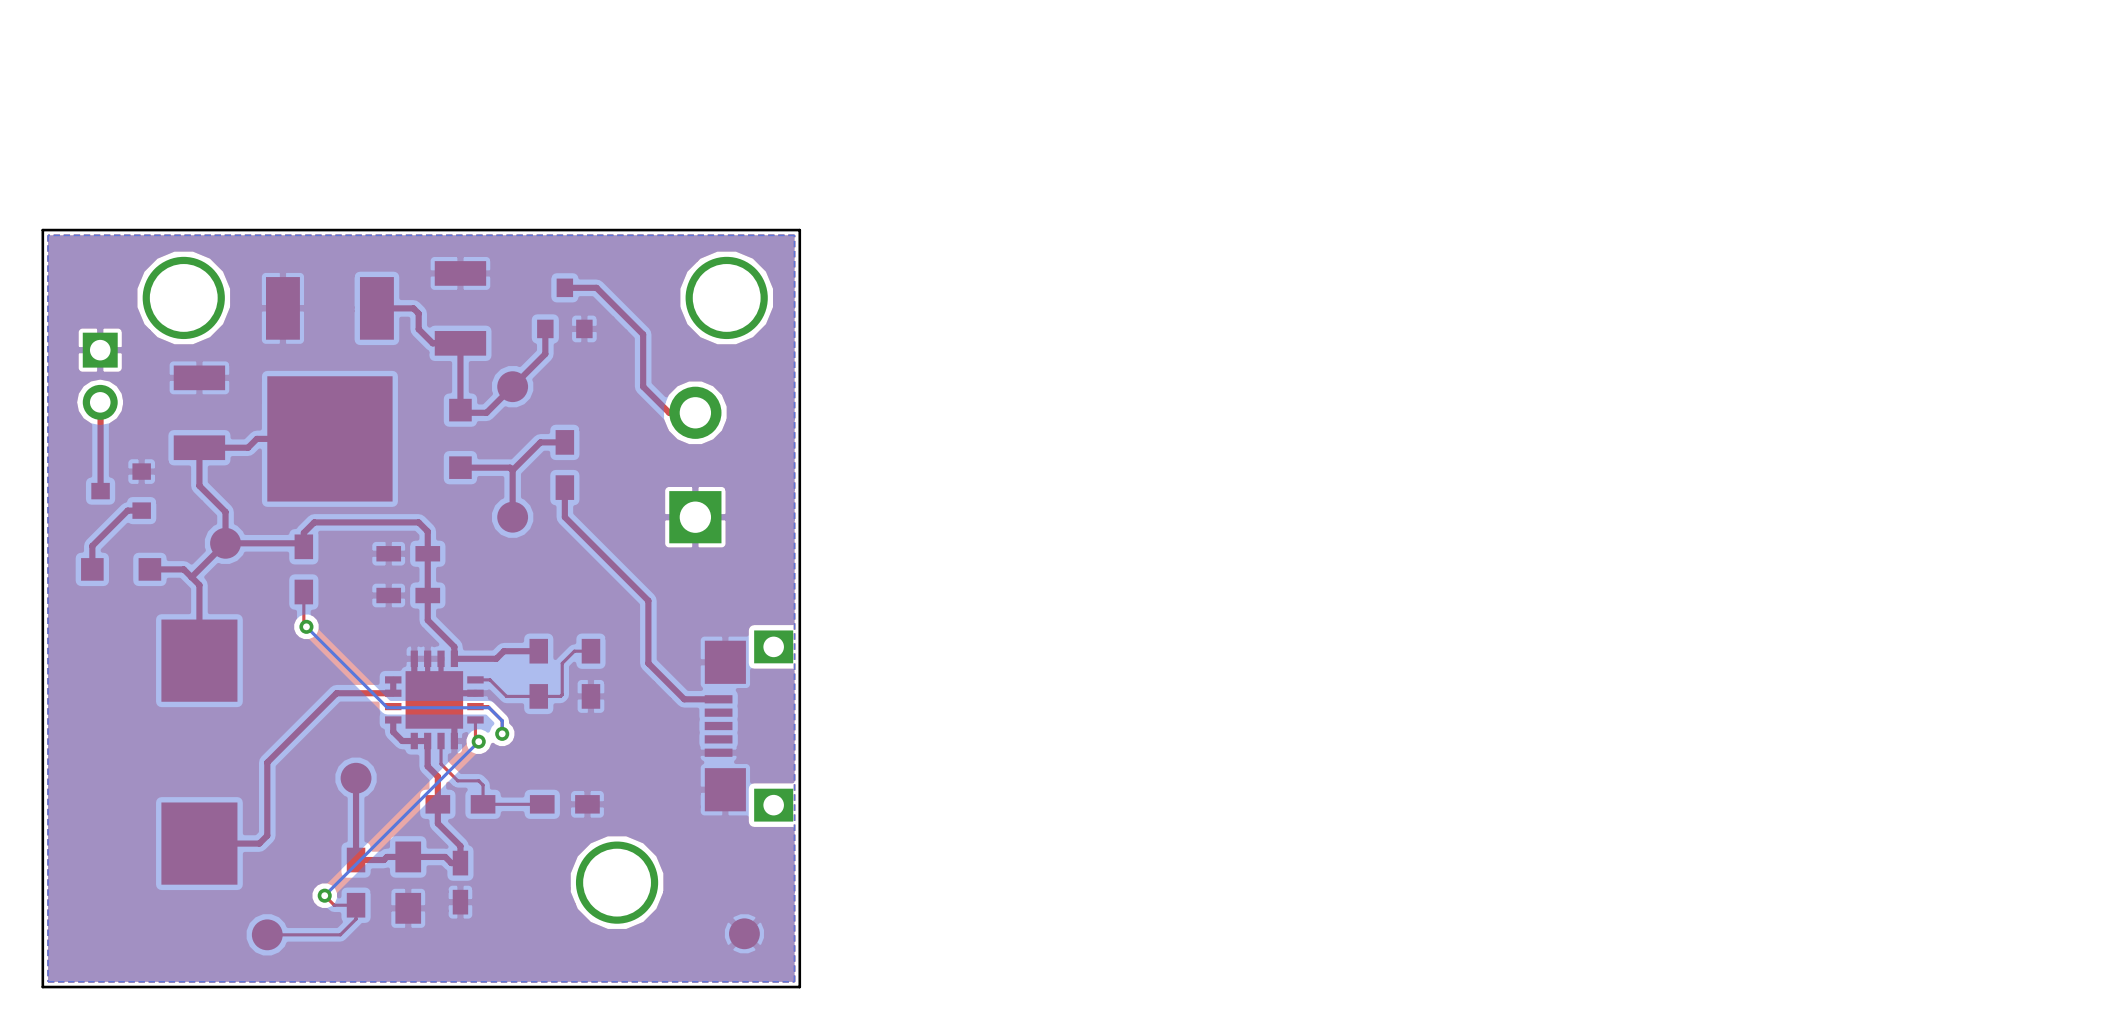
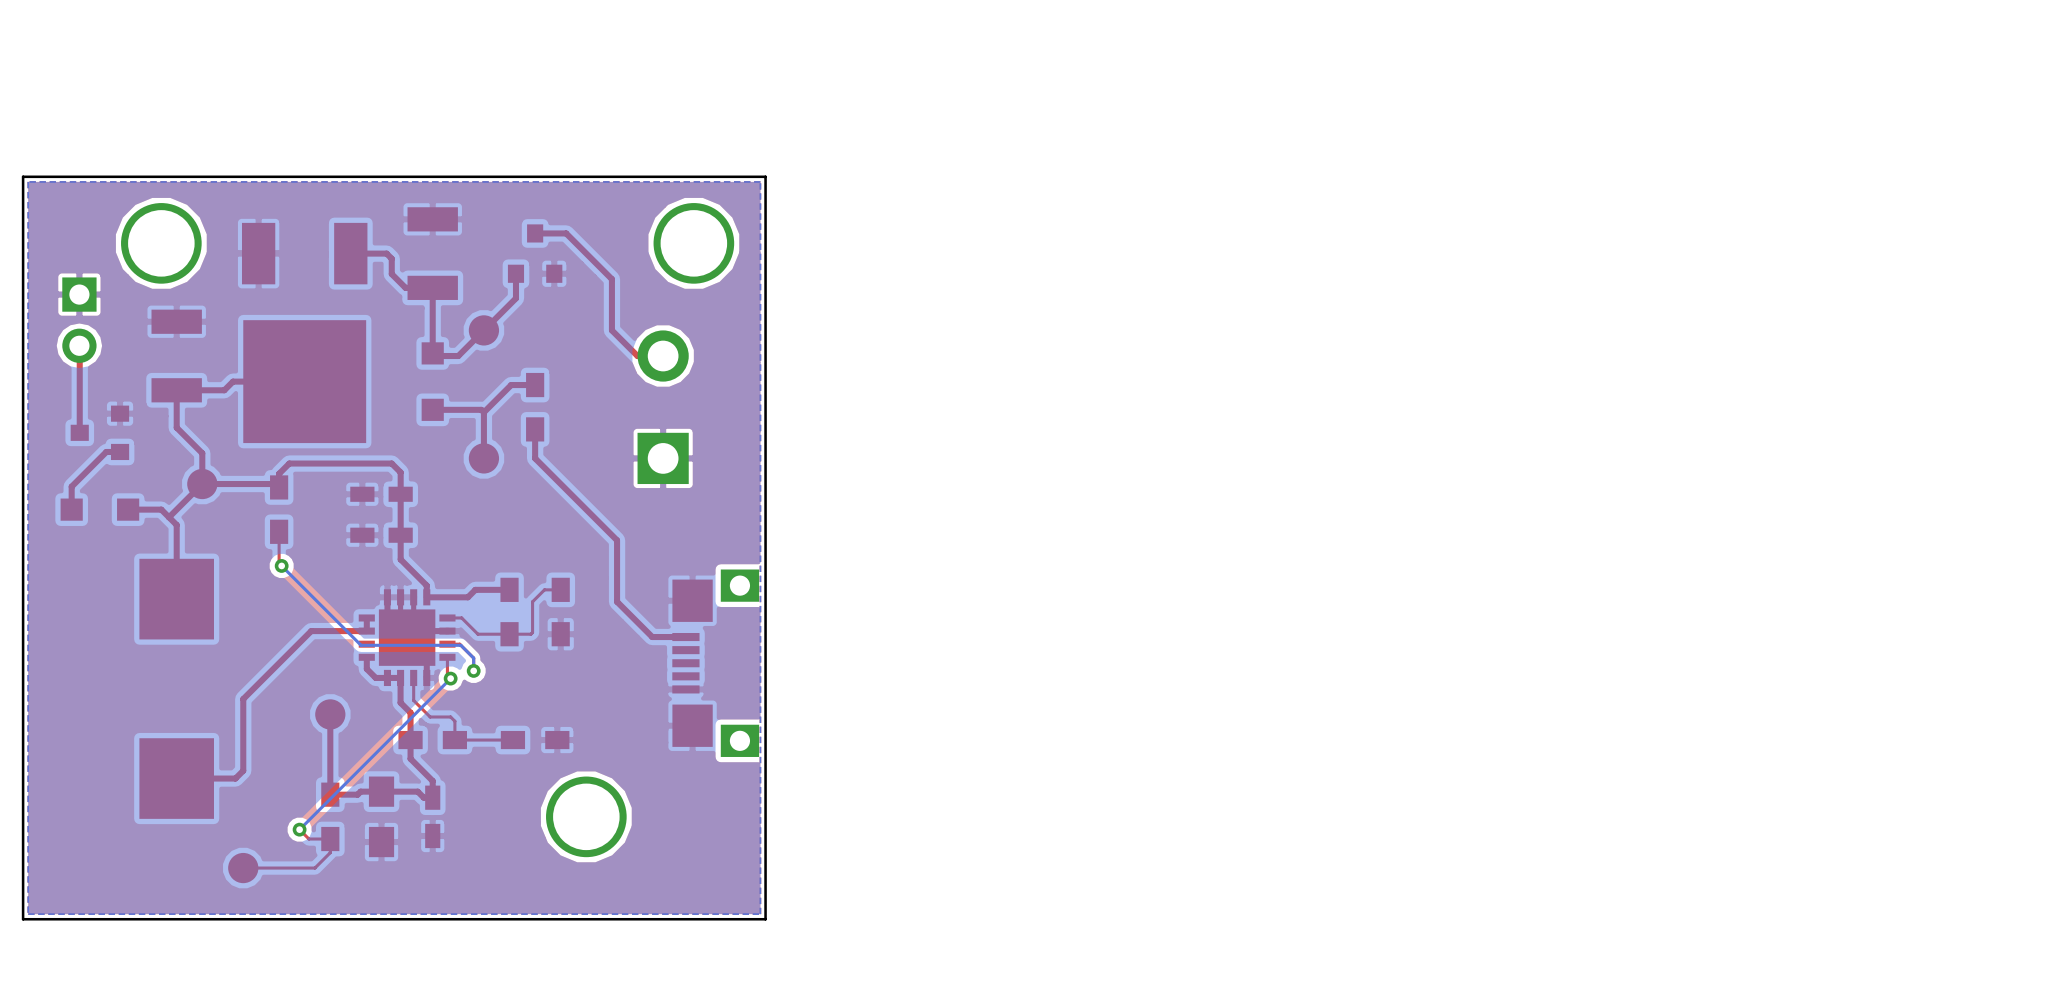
part: (744, 933) -> none

